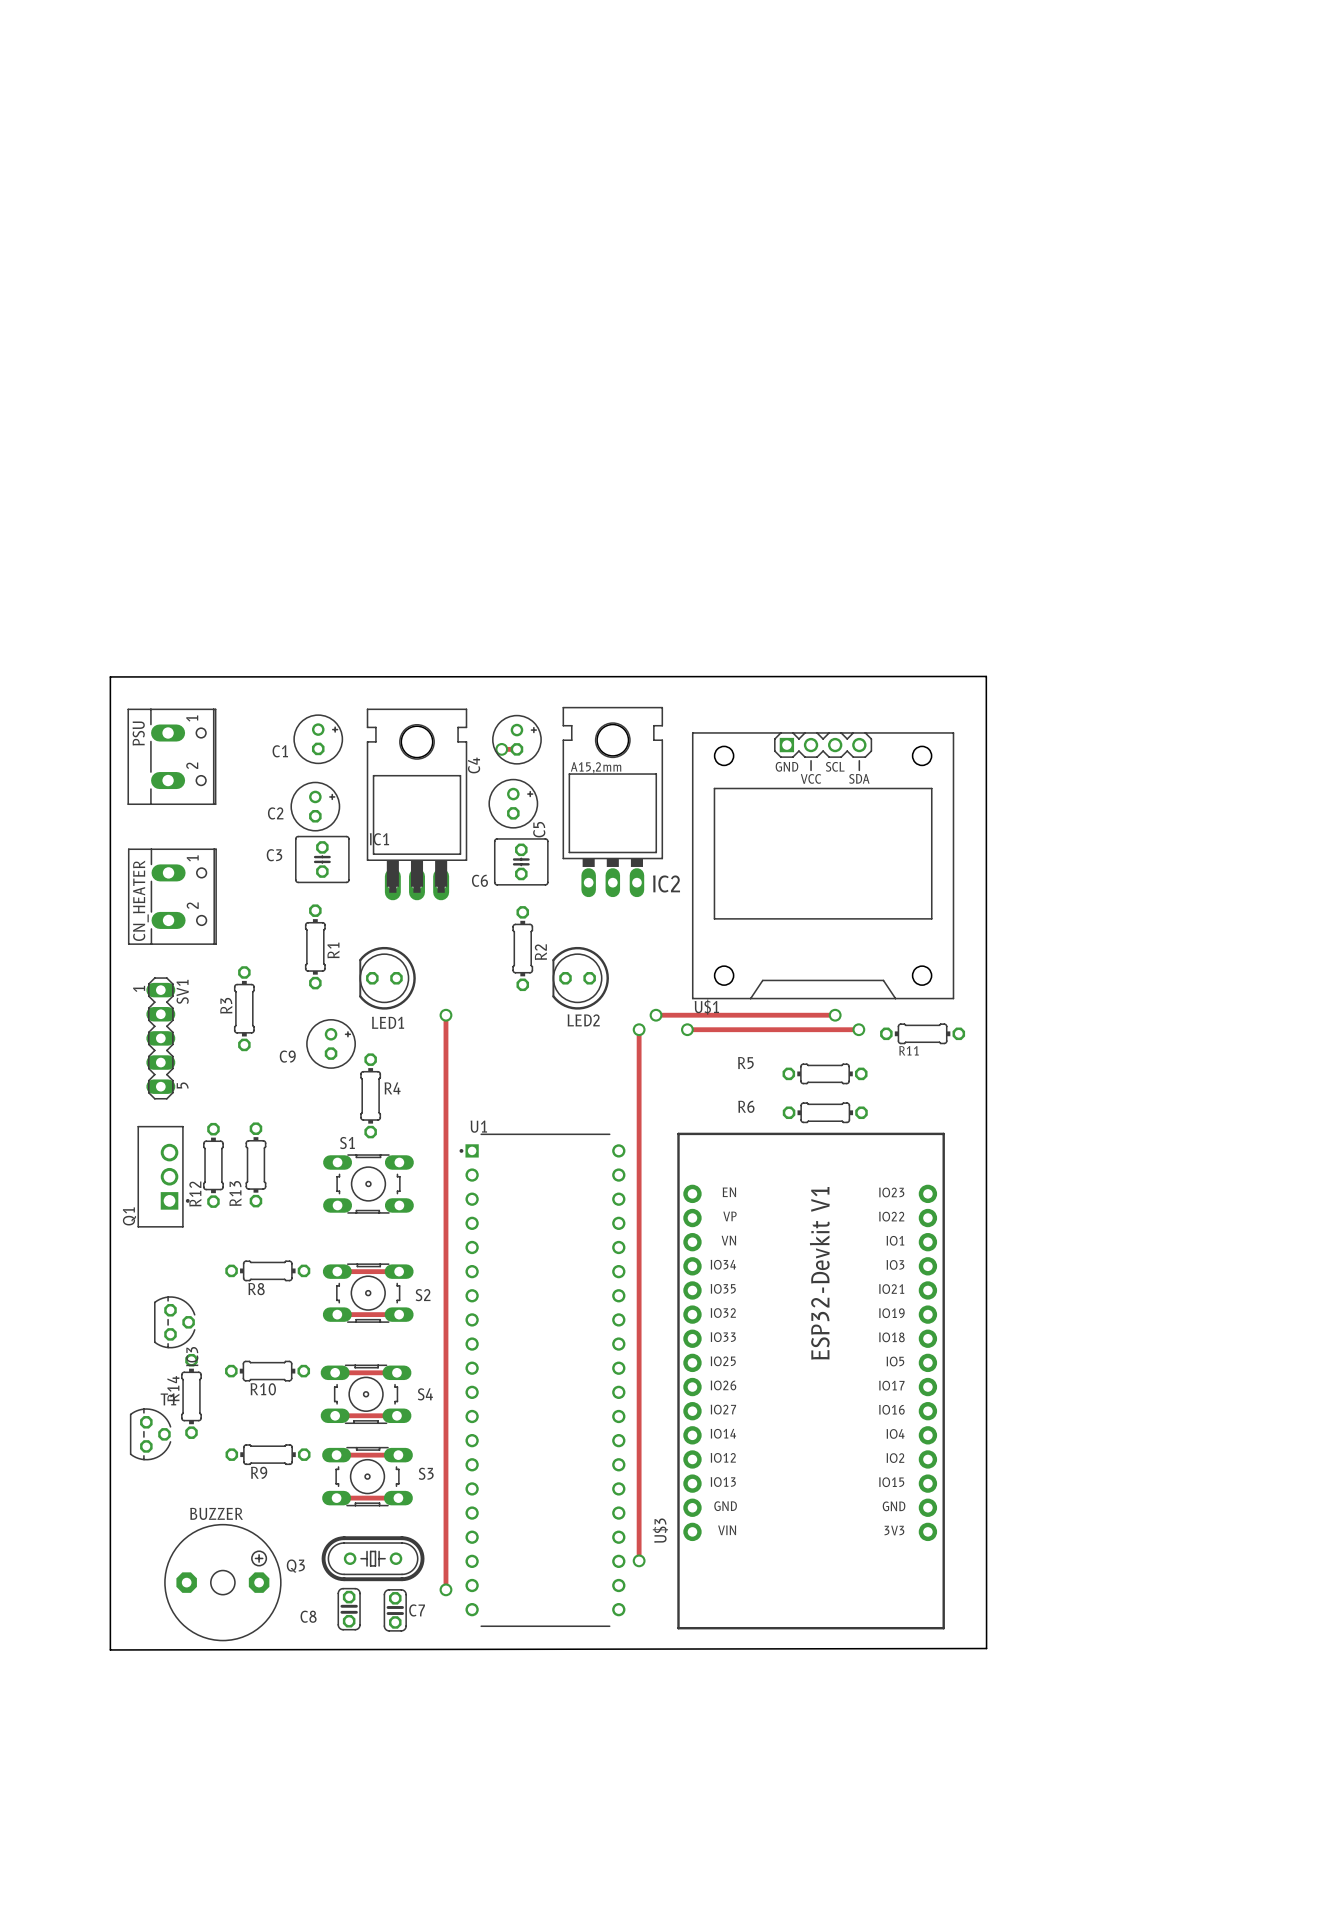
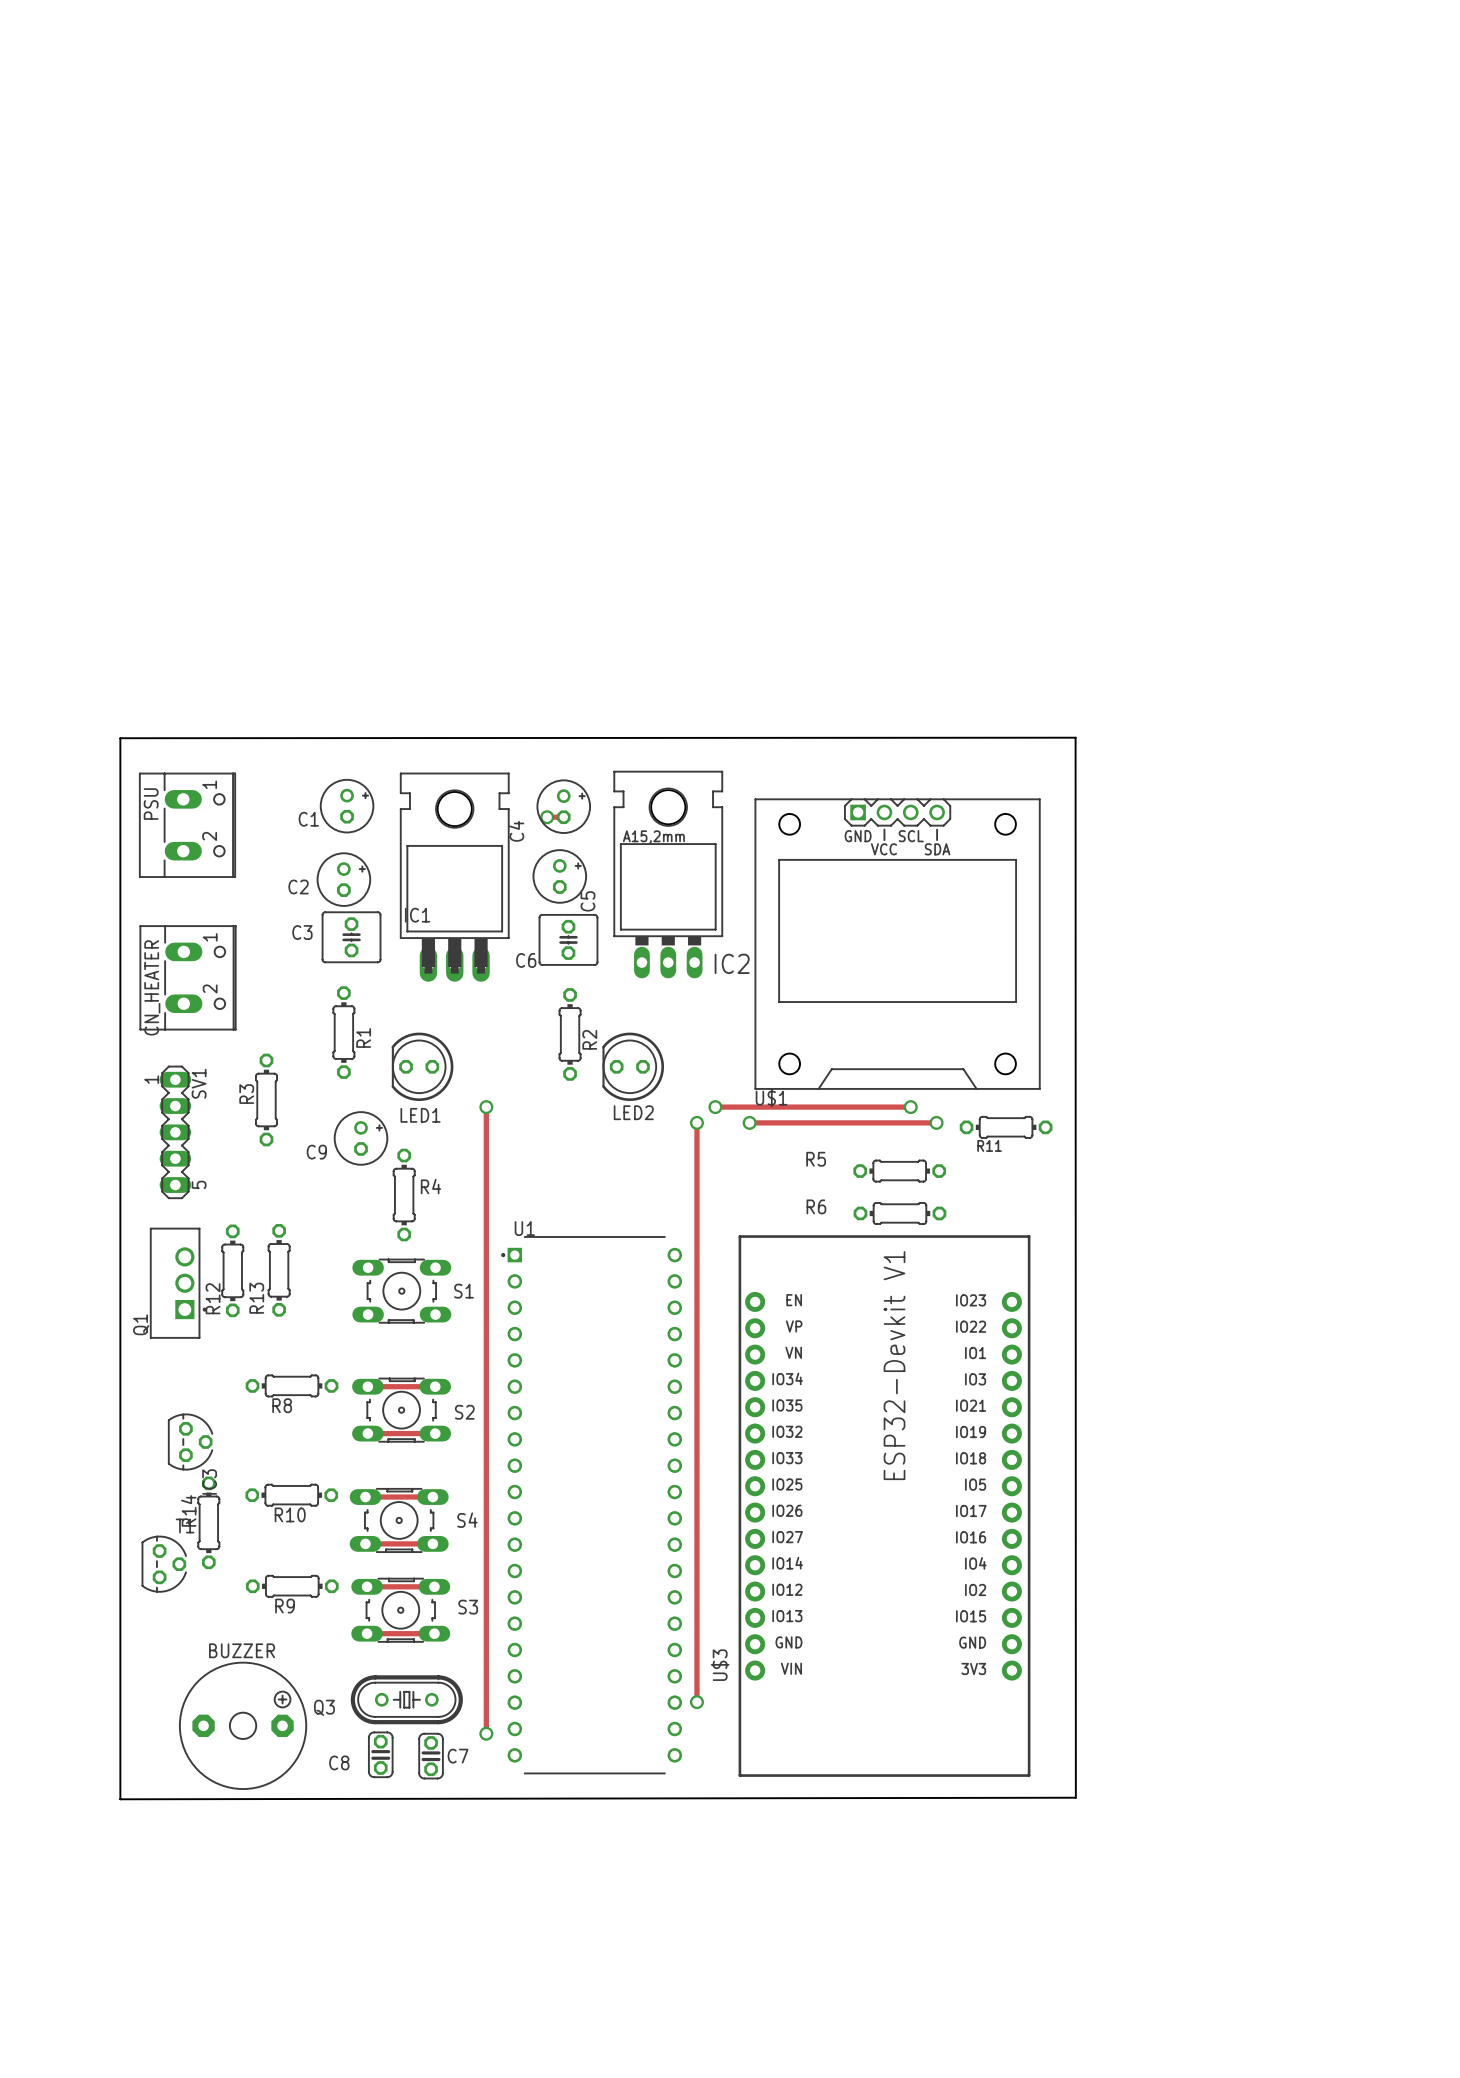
S1 name position: S1 (347, 1143) -> S1 (463, 1291)

